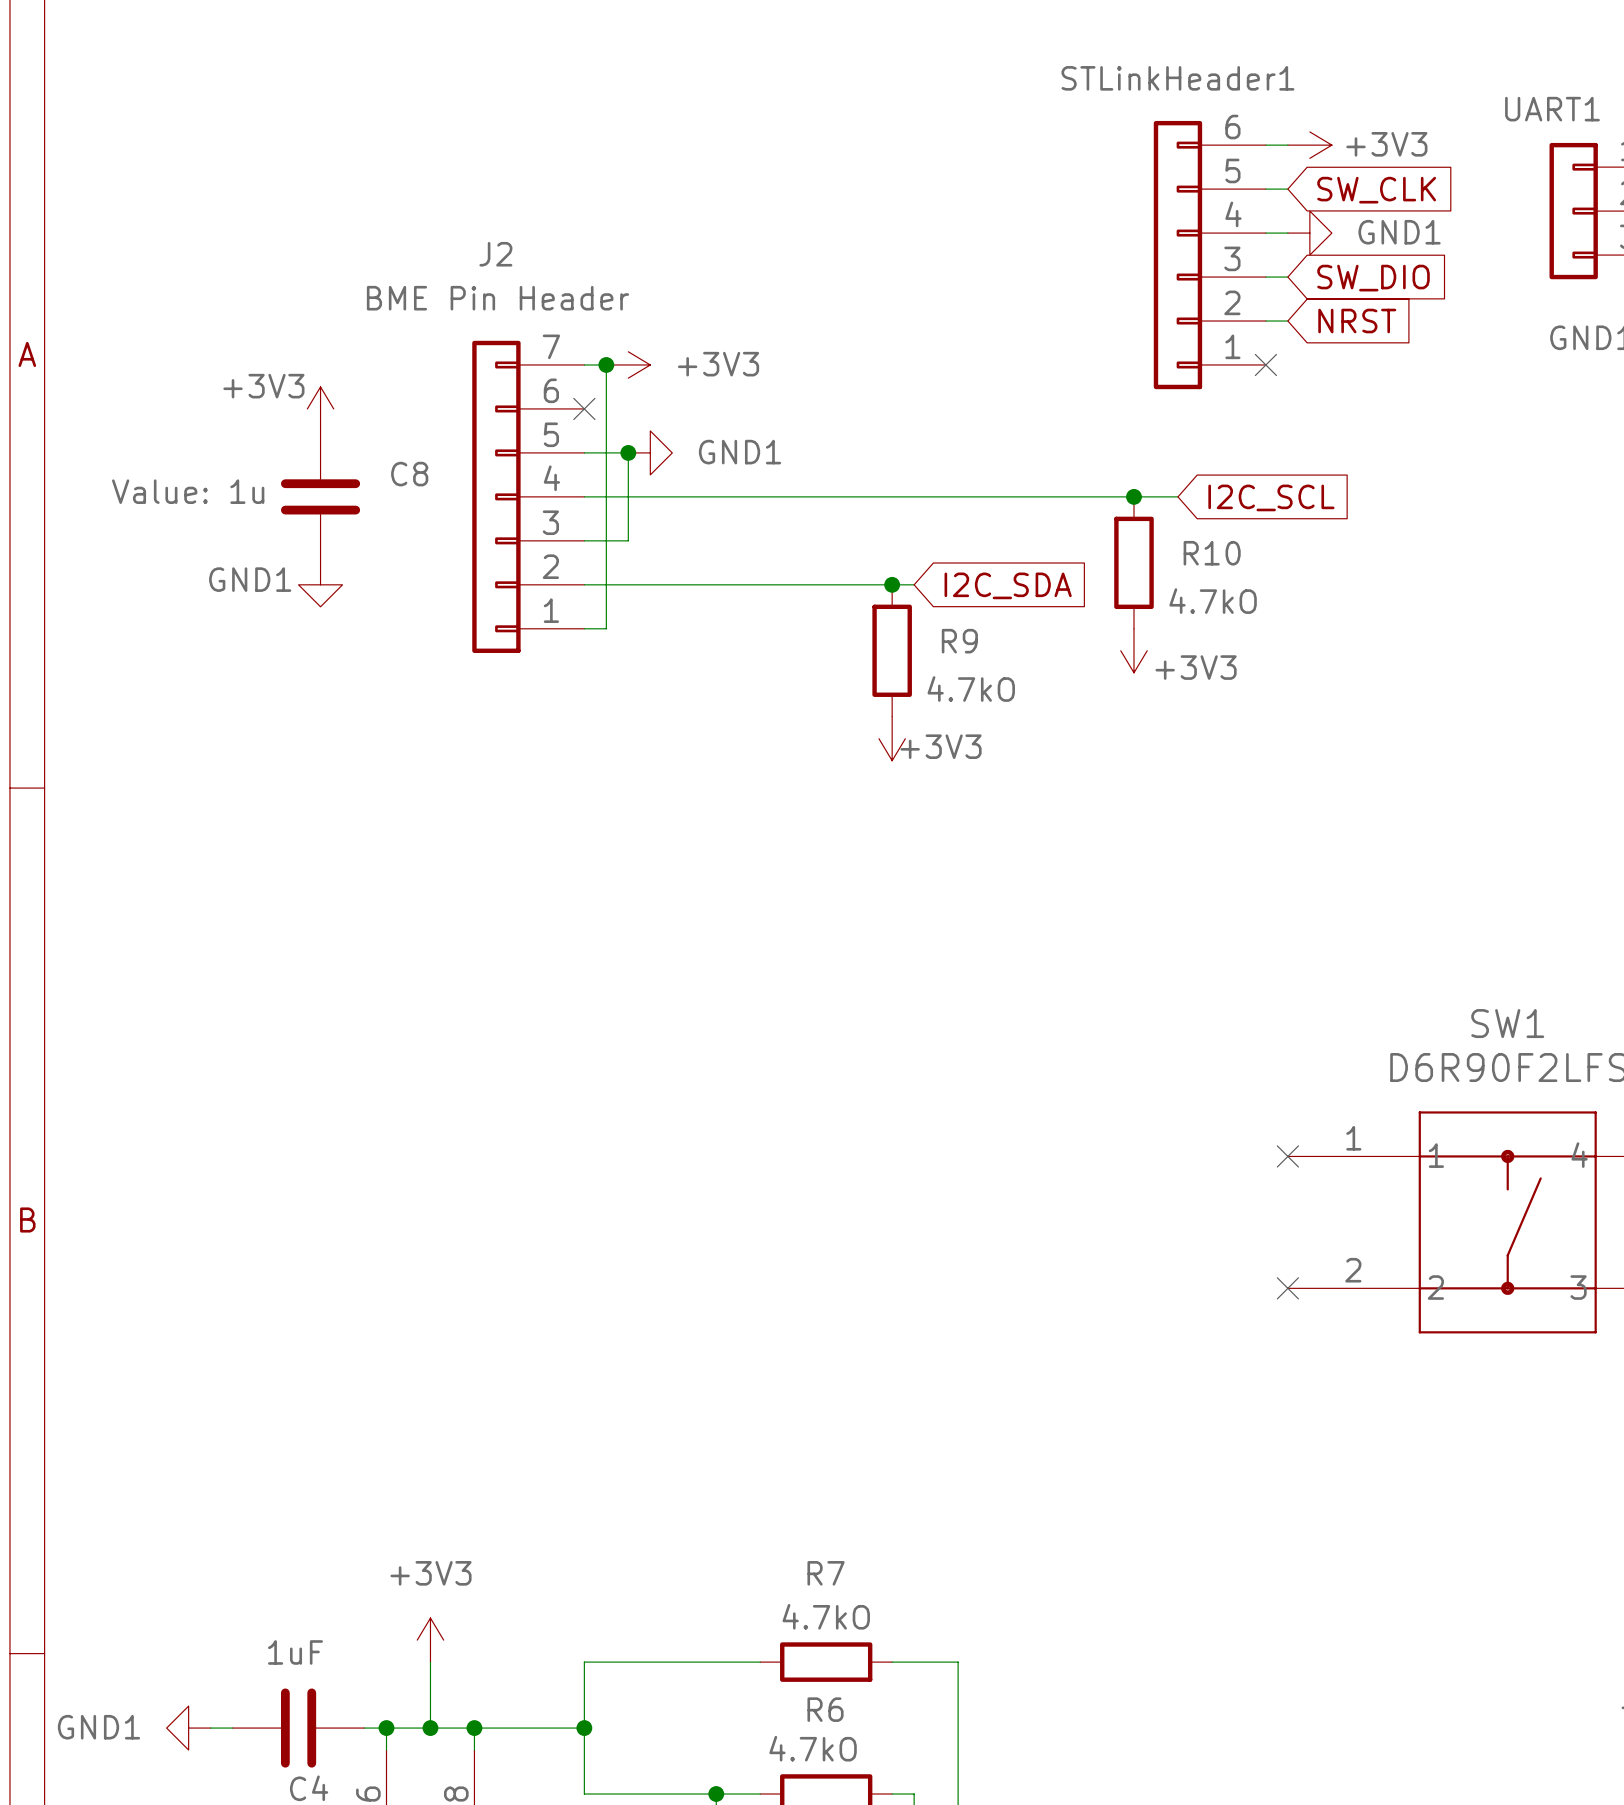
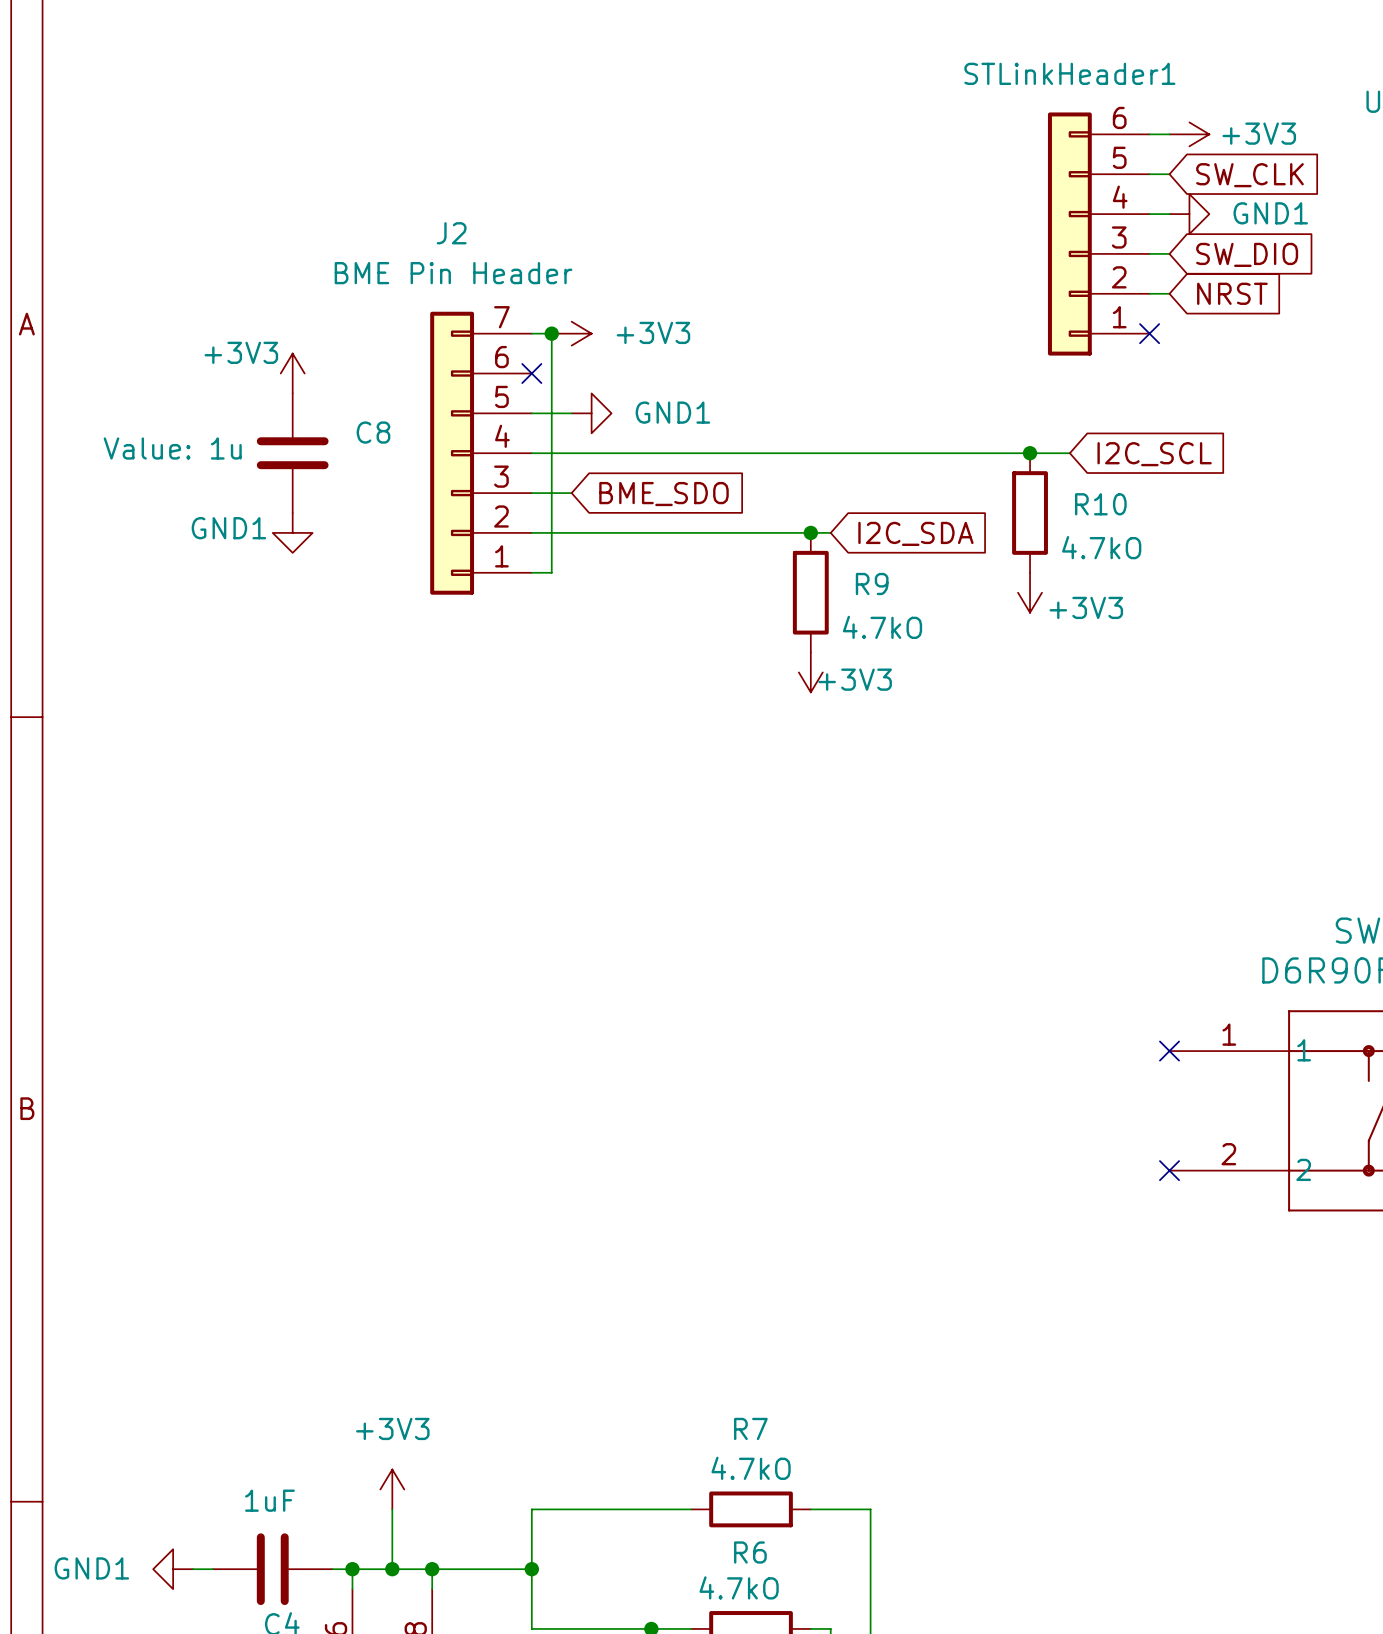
wire: (628, 452) (628, 540) -> none
junction: (628, 452) -> none
global label: none -> BME_SDO (663, 494)

